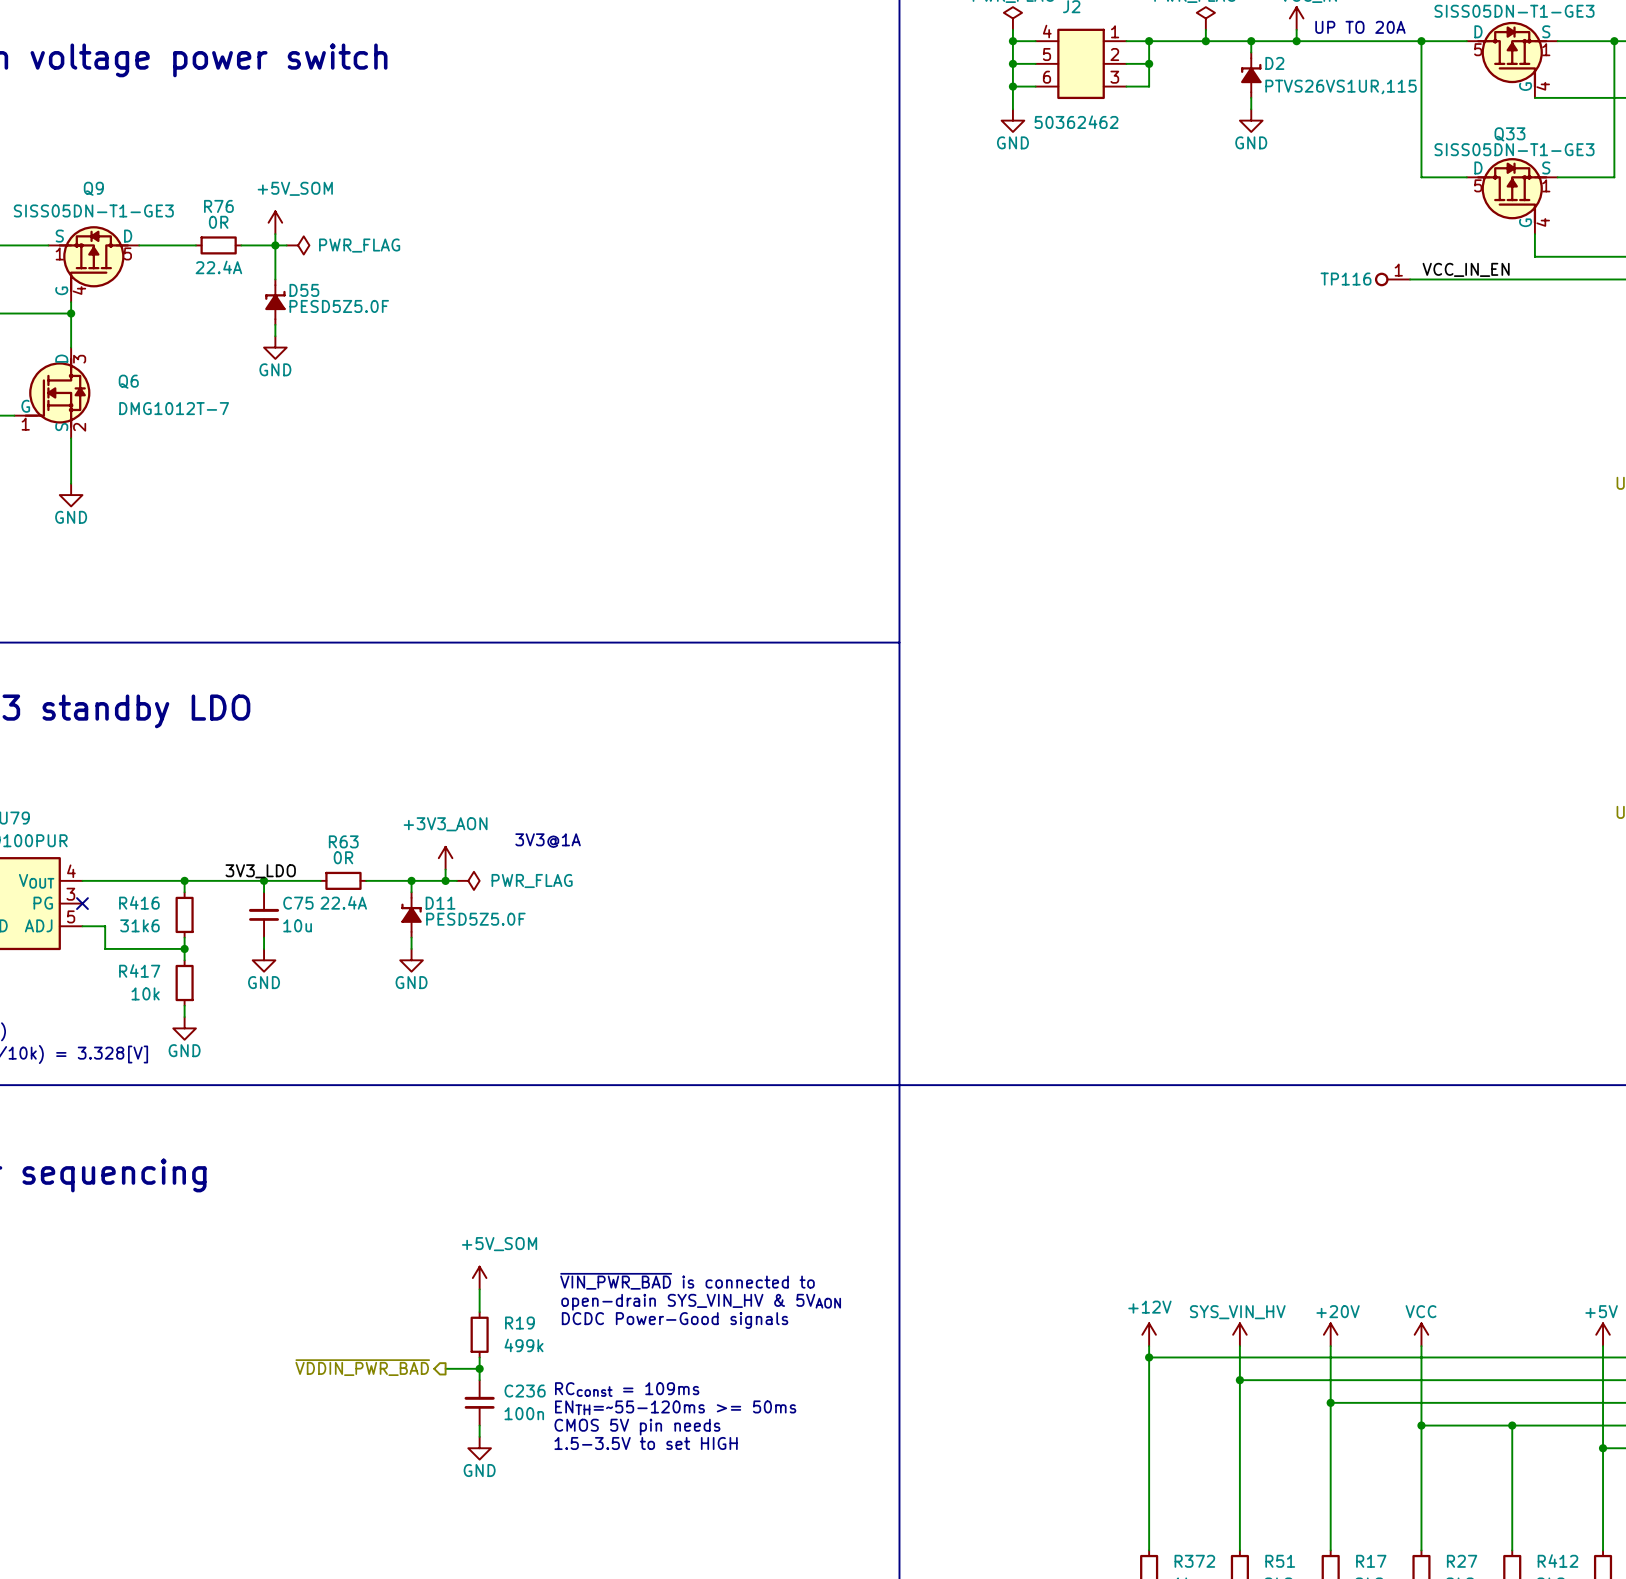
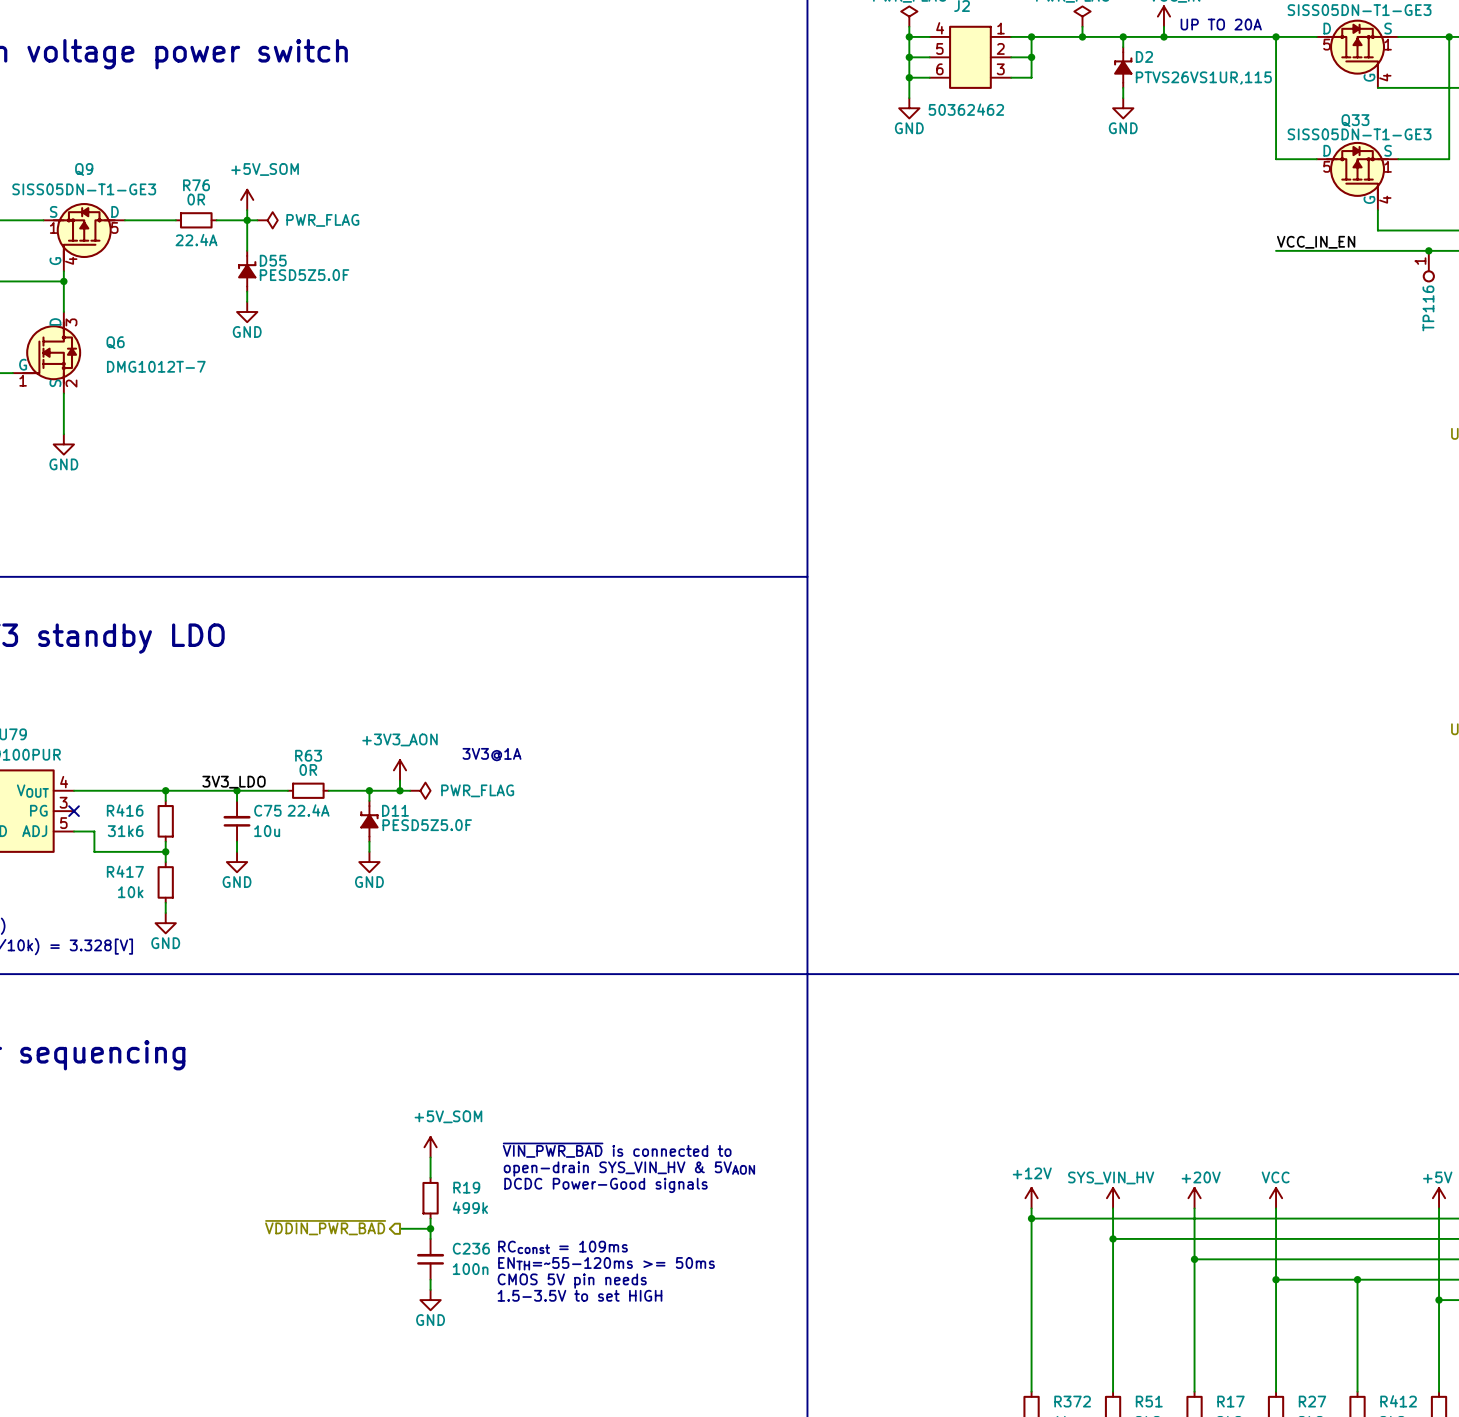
TP116 rotation: 0° (1381, 279) -> 90° counterclockwise (1428, 276)
TP116 position: (1392, 279) -> (1428, 266)
wire: (1410, 279) (1421, 279) -> none
junction: none -> (1428, 250)

